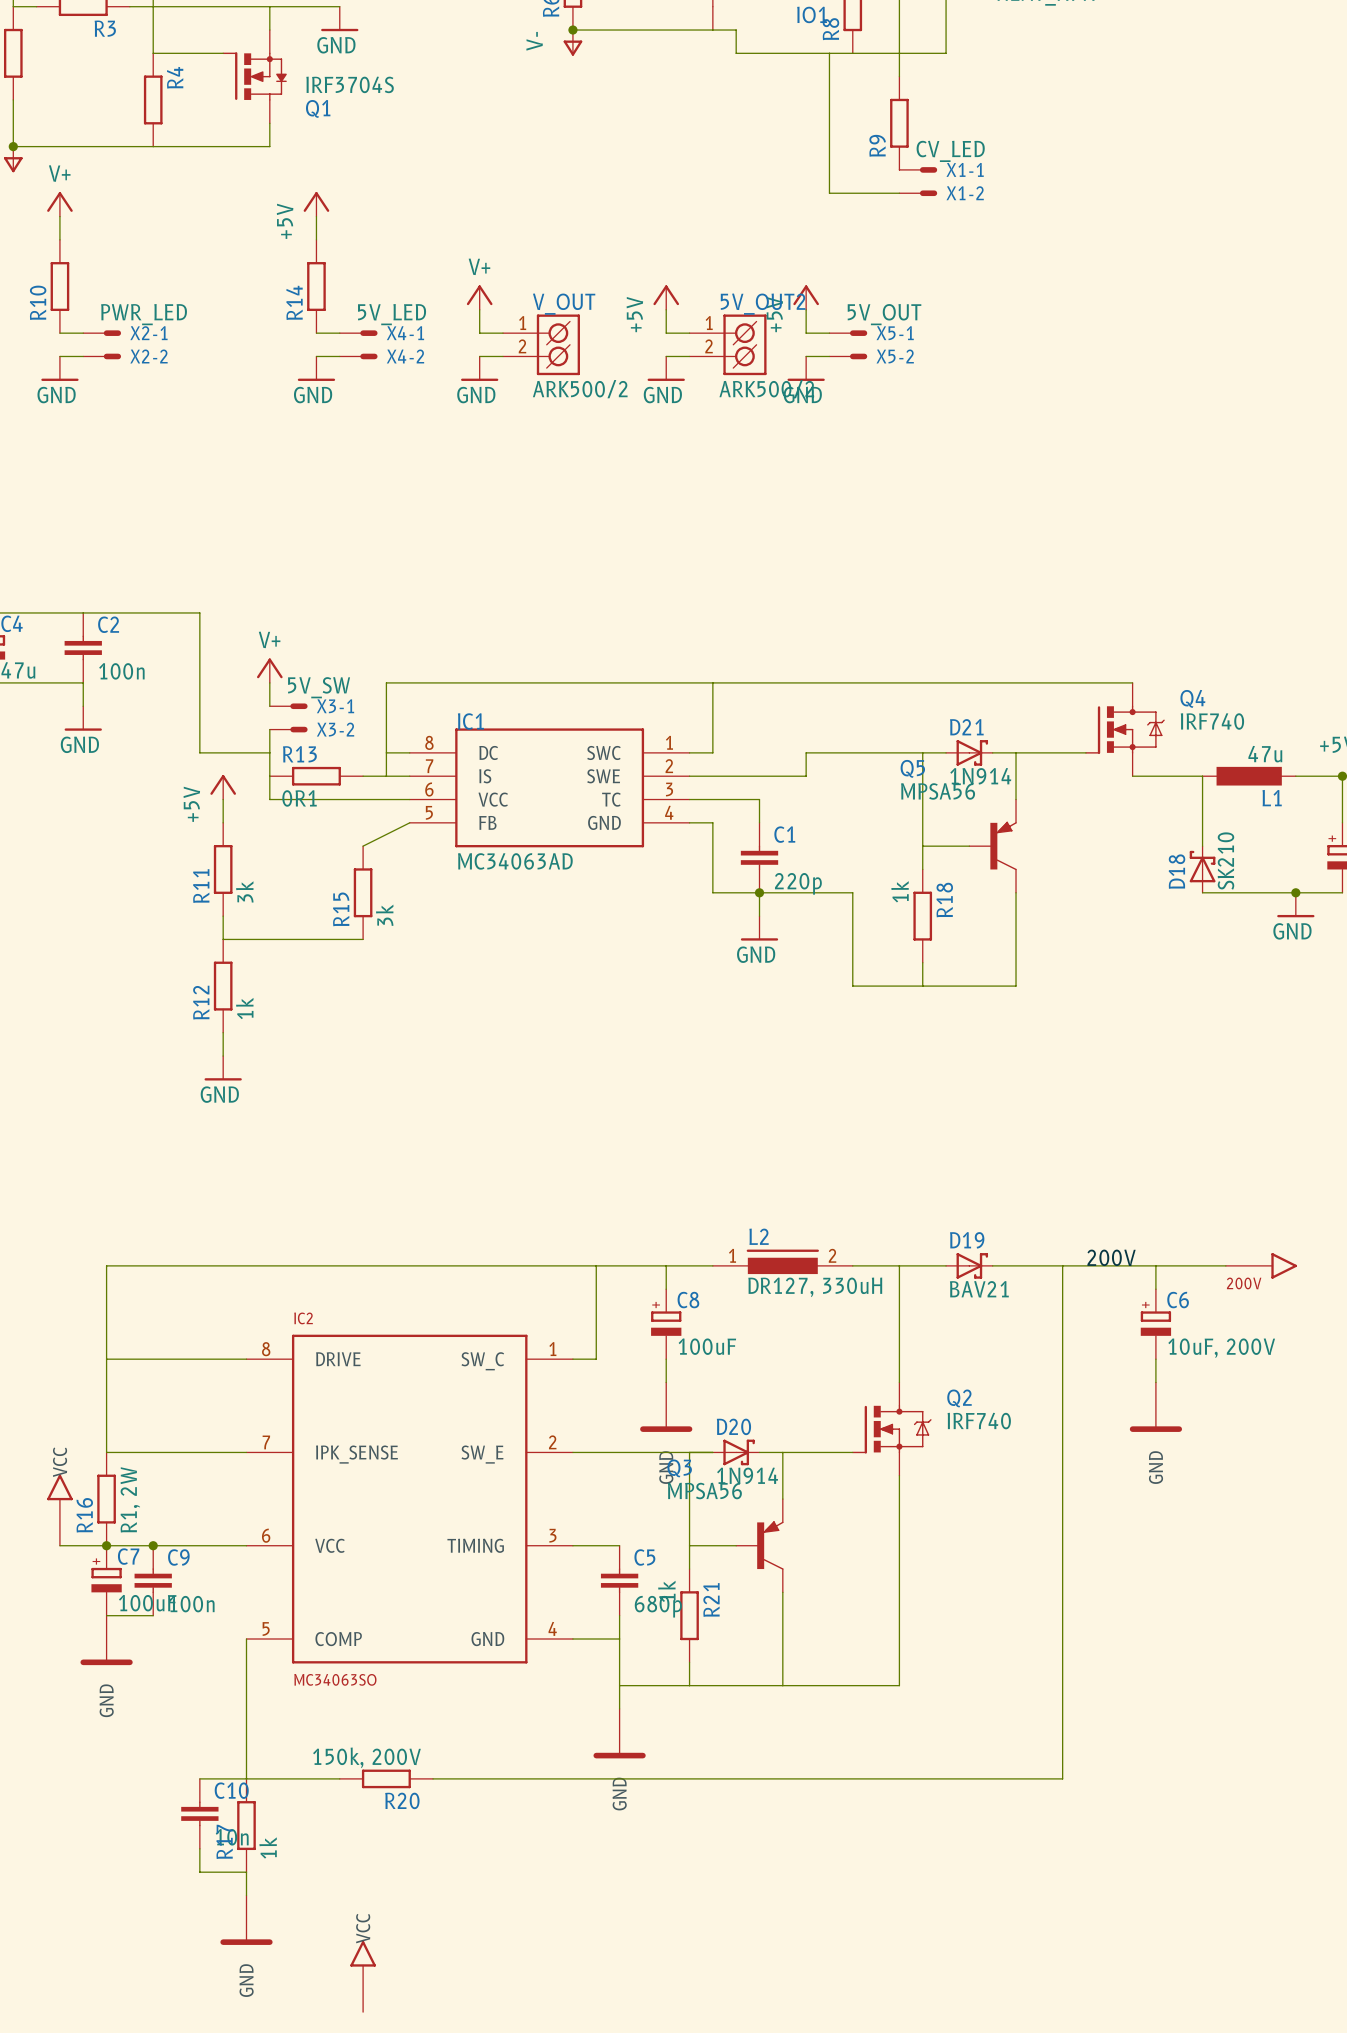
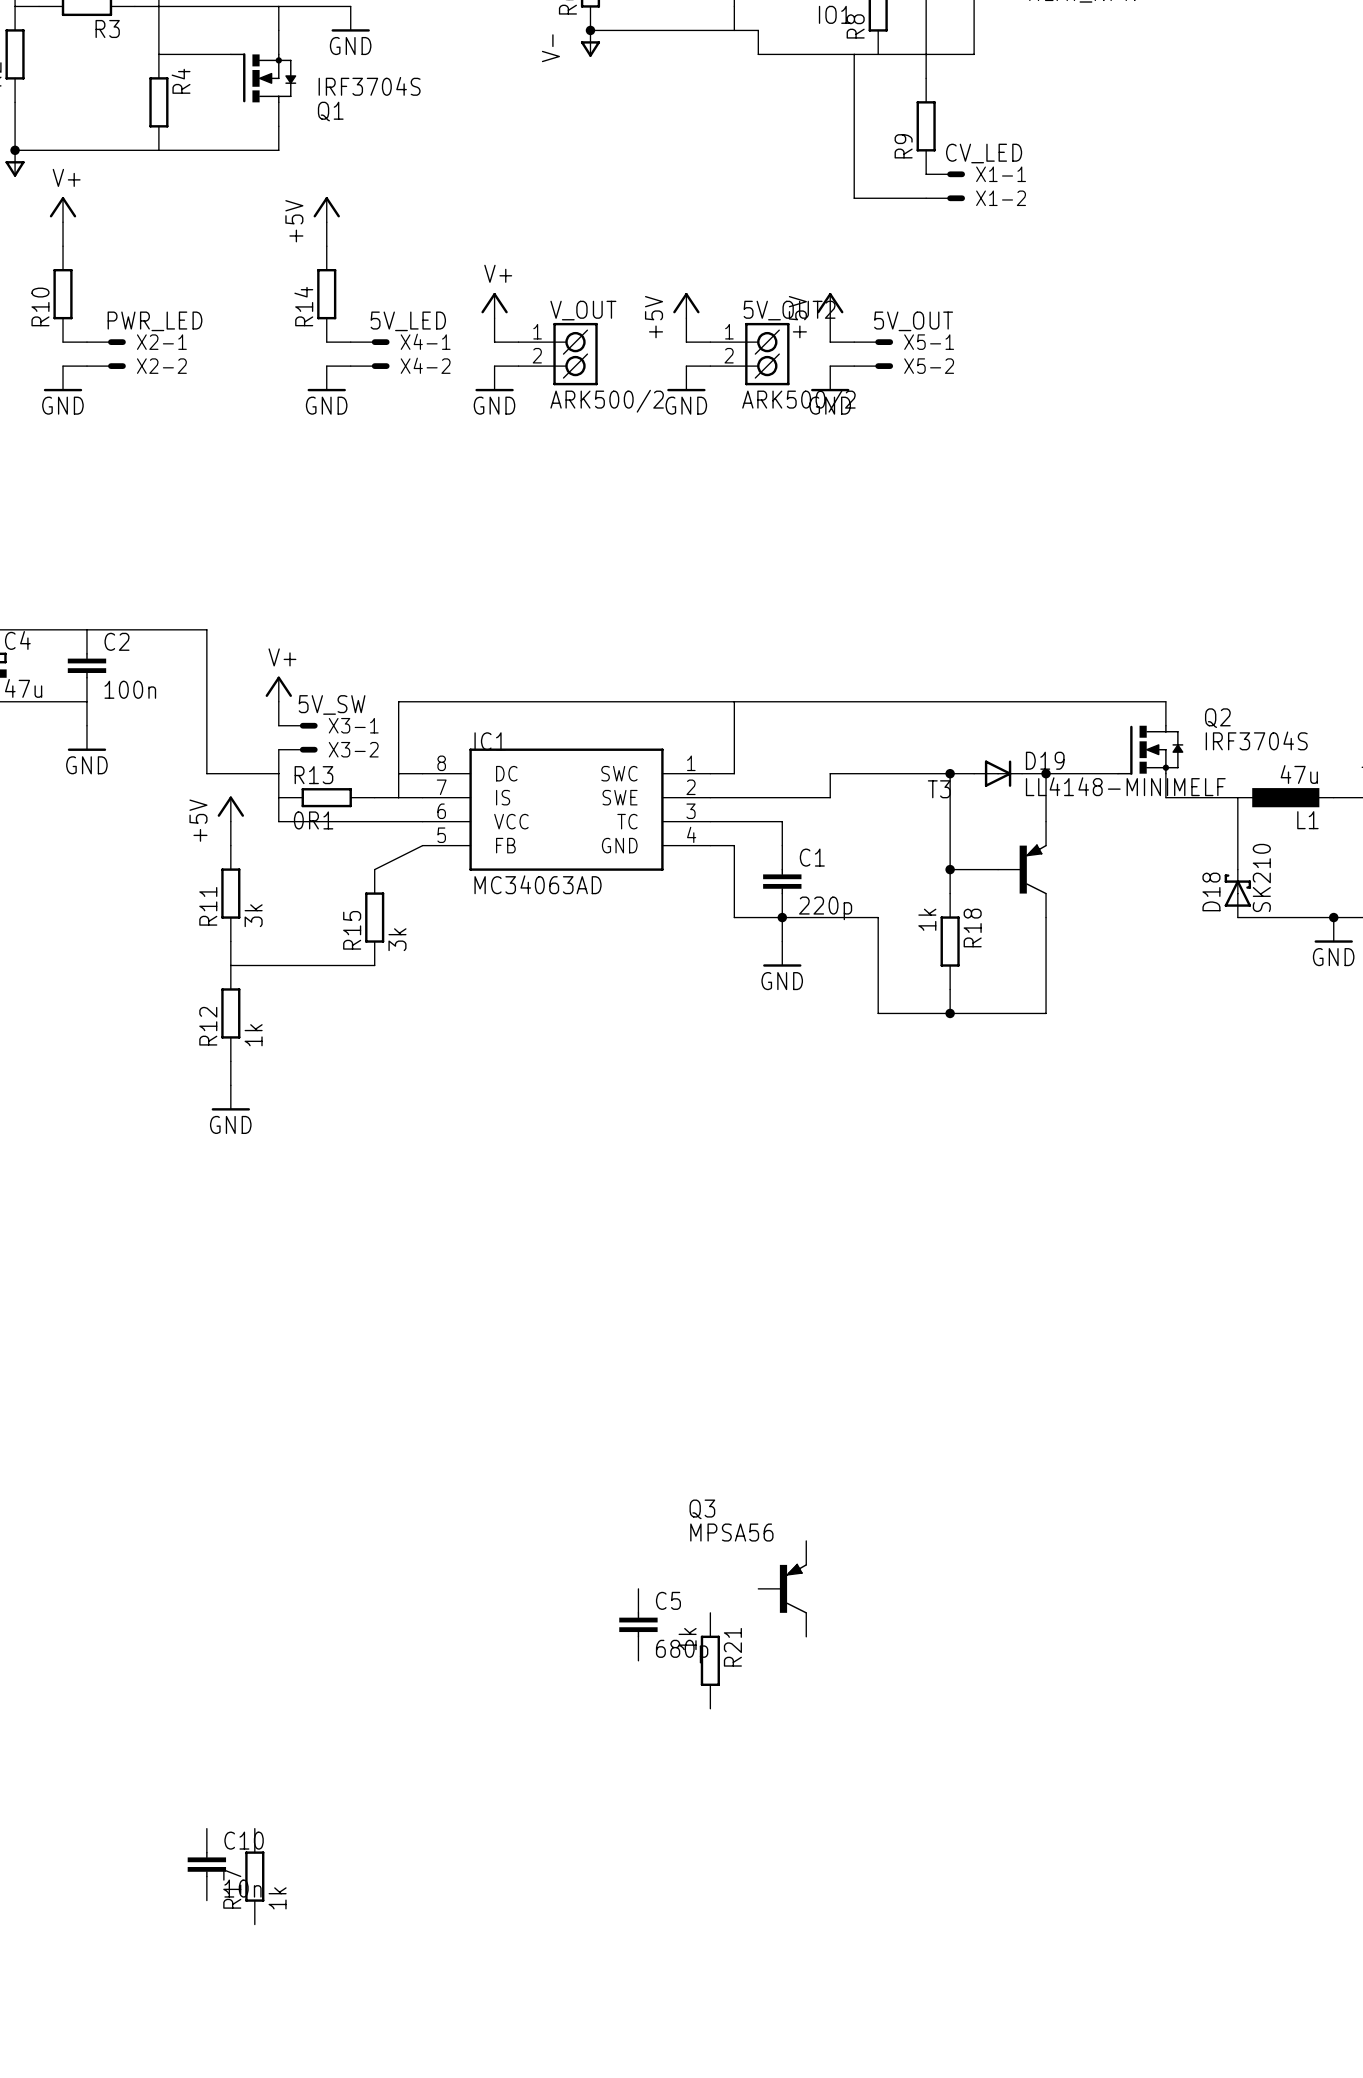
Q4: IRF740 (1125, 729) -> none
junction: none -> (950, 773)
D21: 1N914 (969, 752) -> none
junction: none -> (1046, 773)
Q5 name: Q5 (912, 768) -> T3 (939, 789)
Q5 value: MPSA56 (938, 791) -> none
junction: none -> (950, 869)
junction: none -> (950, 1013)
D19 name position: D19 (967, 1240) -> D19 (1045, 760)
D19 symbol: [946, 1253, 993, 1279] -> [974, 760, 1023, 787]
label: 200V (1111, 1257) -> none
L2: DR127, 330uH (782, 1261) -> none
wire: (596, 1265) (596, 1359) (572, 1359) -> none
wire: (666, 1265) (666, 1289) -> none
wire: (712, 1265) (106, 1265) (106, 1452) (246, 1452) -> none
wire: (852, 1265) (946, 1265) -> none
wire: (899, 1265) (899, 1382) -> none
wire: (992, 1265) (1225, 1265) -> none
wire: (1062, 1265) (1062, 1778) (433, 1778) -> none
wire: (1155, 1265) (1155, 1289) -> none
power symbol: 200V (1261, 1265) -> none
D19 value: BAV21 (979, 1289) -> LL4148-MINIMELF (1125, 786)
C8: 100uF (666, 1324) -> none
C6: 10uF, 200V (1155, 1324) -> none
wire: (106, 1359) (246, 1359) -> none
wire: (666, 1359) (666, 1382) -> none
wire: (1155, 1359) (1155, 1382) -> none
Q2 symbol: [852, 1382, 932, 1476] -> [1117, 701, 1184, 798]
power symbol: (666, 1407) -> none
power symbol: (1155, 1407) -> none
Q2 value: IRF740 (979, 1421) -> IRF3704S (1256, 740)
wire: (572, 1452) (712, 1452) -> none
wire: (689, 1452) (689, 1569) -> none
D20: 1N914 (736, 1452) -> none
wire: (759, 1452) (852, 1452) -> none
wire: (782, 1452) (782, 1499) -> none
wire: (899, 1475) (899, 1685) (619, 1685) -> none
R16: R1, 2W (106, 1499) -> none
IC2: MC34063SO (409, 1499) -> none
power symbol: (59, 1510) -> none
wire: (59, 1545) (246, 1545) -> none
junction: (106, 1545) -> none
junction: (153, 1545) -> none
wire: (572, 1545) (619, 1545) -> none
wire: (689, 1545) (736, 1545) -> none
C7: 100uF (106, 1580) -> none
C9: 100n (153, 1580) -> none
wire: (782, 1592) (782, 1685) -> none
wire: (106, 1615) (153, 1615) -> none
wire: (619, 1615) (619, 1708) -> none
wire: (246, 1639) (246, 1778) -> none
wire: (572, 1639) (619, 1639) -> none
power symbol: (106, 1640) -> none
wire: (689, 1662) (689, 1685) -> none
power symbol: (619, 1733) -> none
wire: (199, 1778) (339, 1778) -> none
R20: 150k, 200V (386, 1778) -> none
wire: (199, 1848) (199, 1872) (246, 1872) (246, 1895) -> none
power symbol: (246, 1920) -> none
power symbol: (363, 1976) -> none

